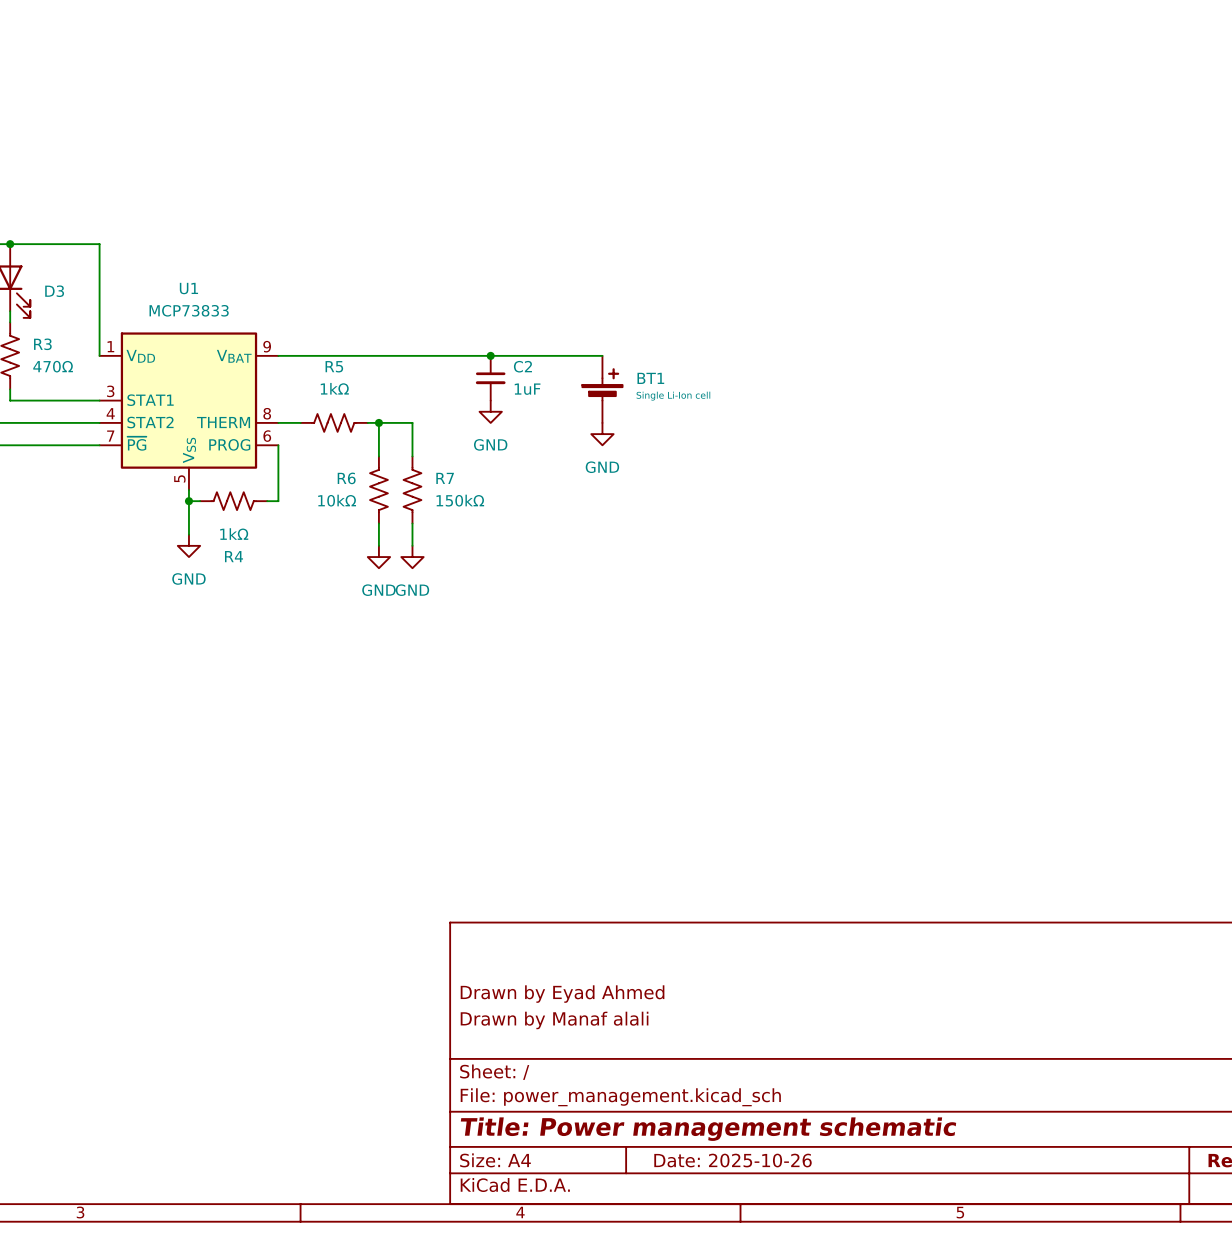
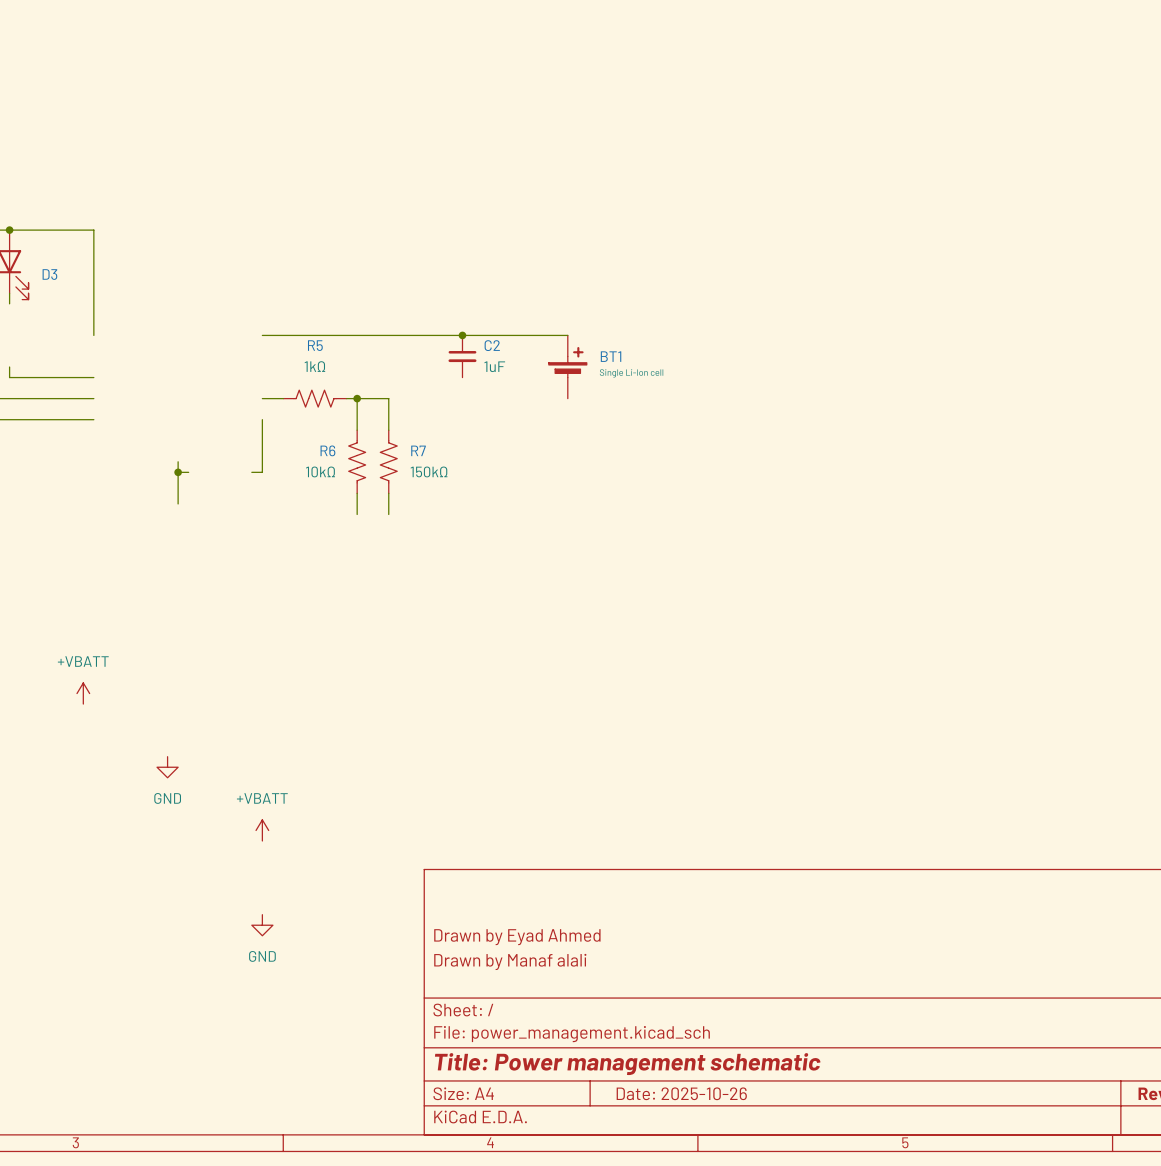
R3: 470Ω (10, 355) -> none
U1: MCP73833 (188, 411) -> none
power symbol: GND (490, 411) -> none
power symbol: GND (602, 434) -> none
R4: 1kΩ (233, 501) -> none
power symbol: GND (188, 545) -> none
power symbol: GND (378, 557) -> none
power symbol: GND (412, 557) -> none
power symbol: none -> +VBATT (83, 693)
power symbol: none -> GND (167, 767)
power symbol: none -> +VBATT (262, 830)
power symbol: none -> GND (262, 925)

